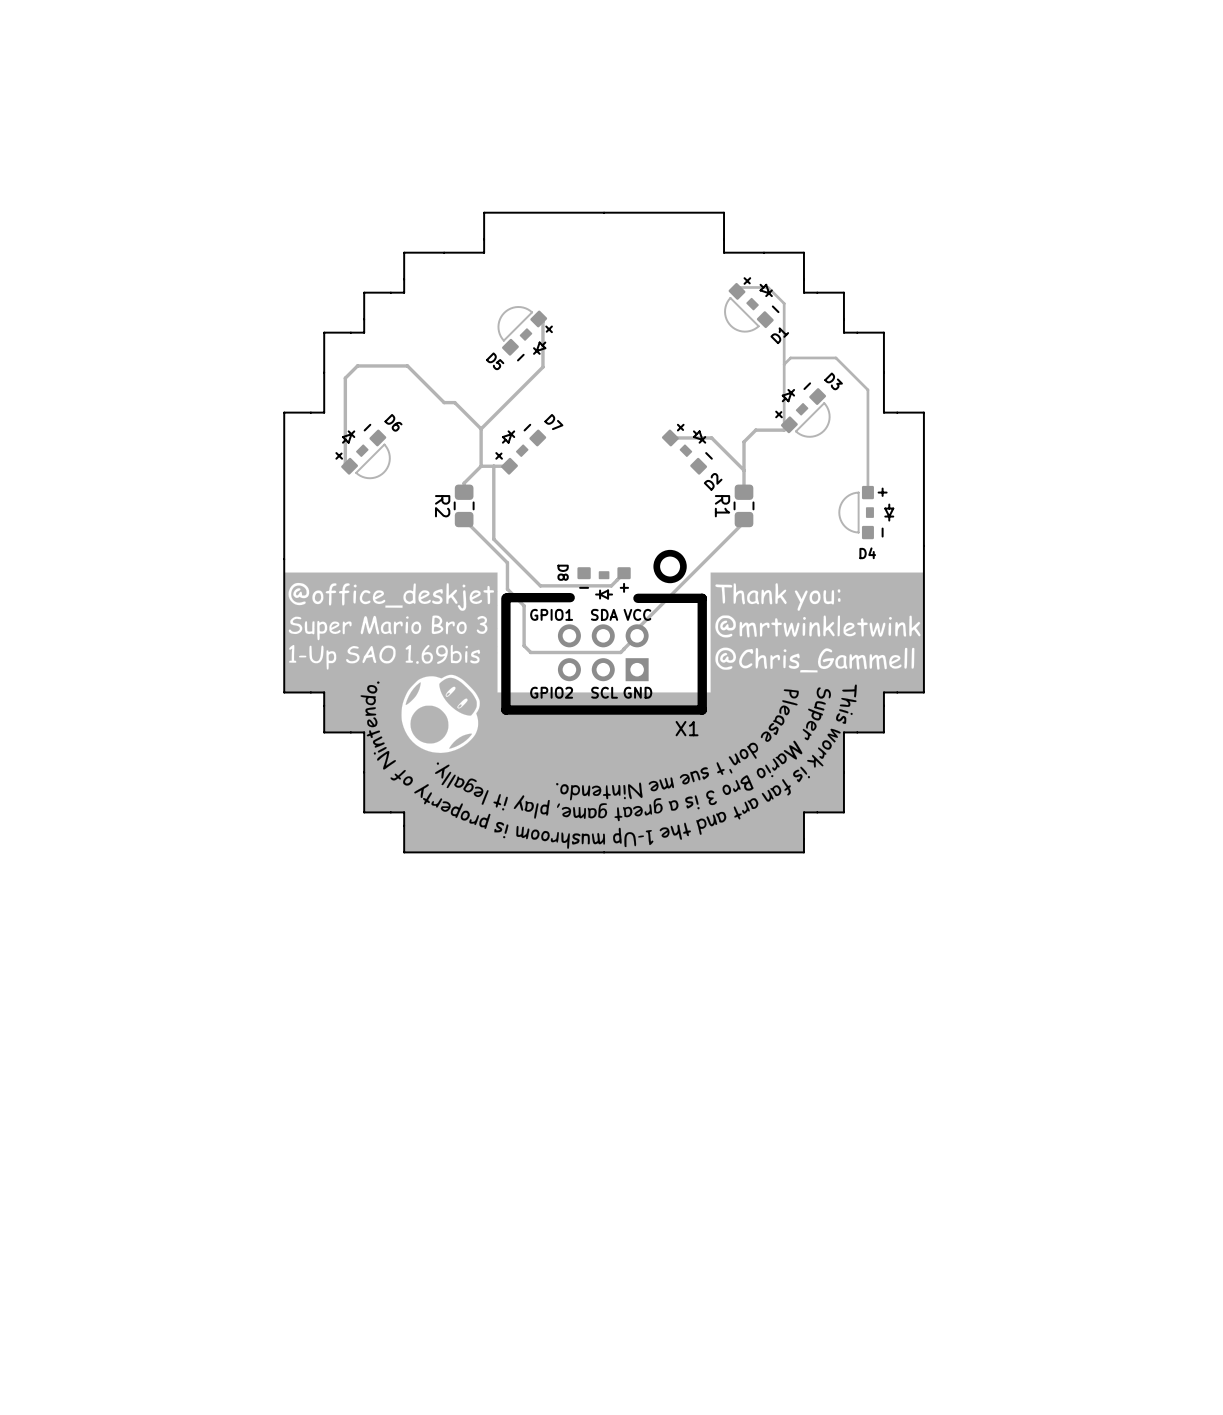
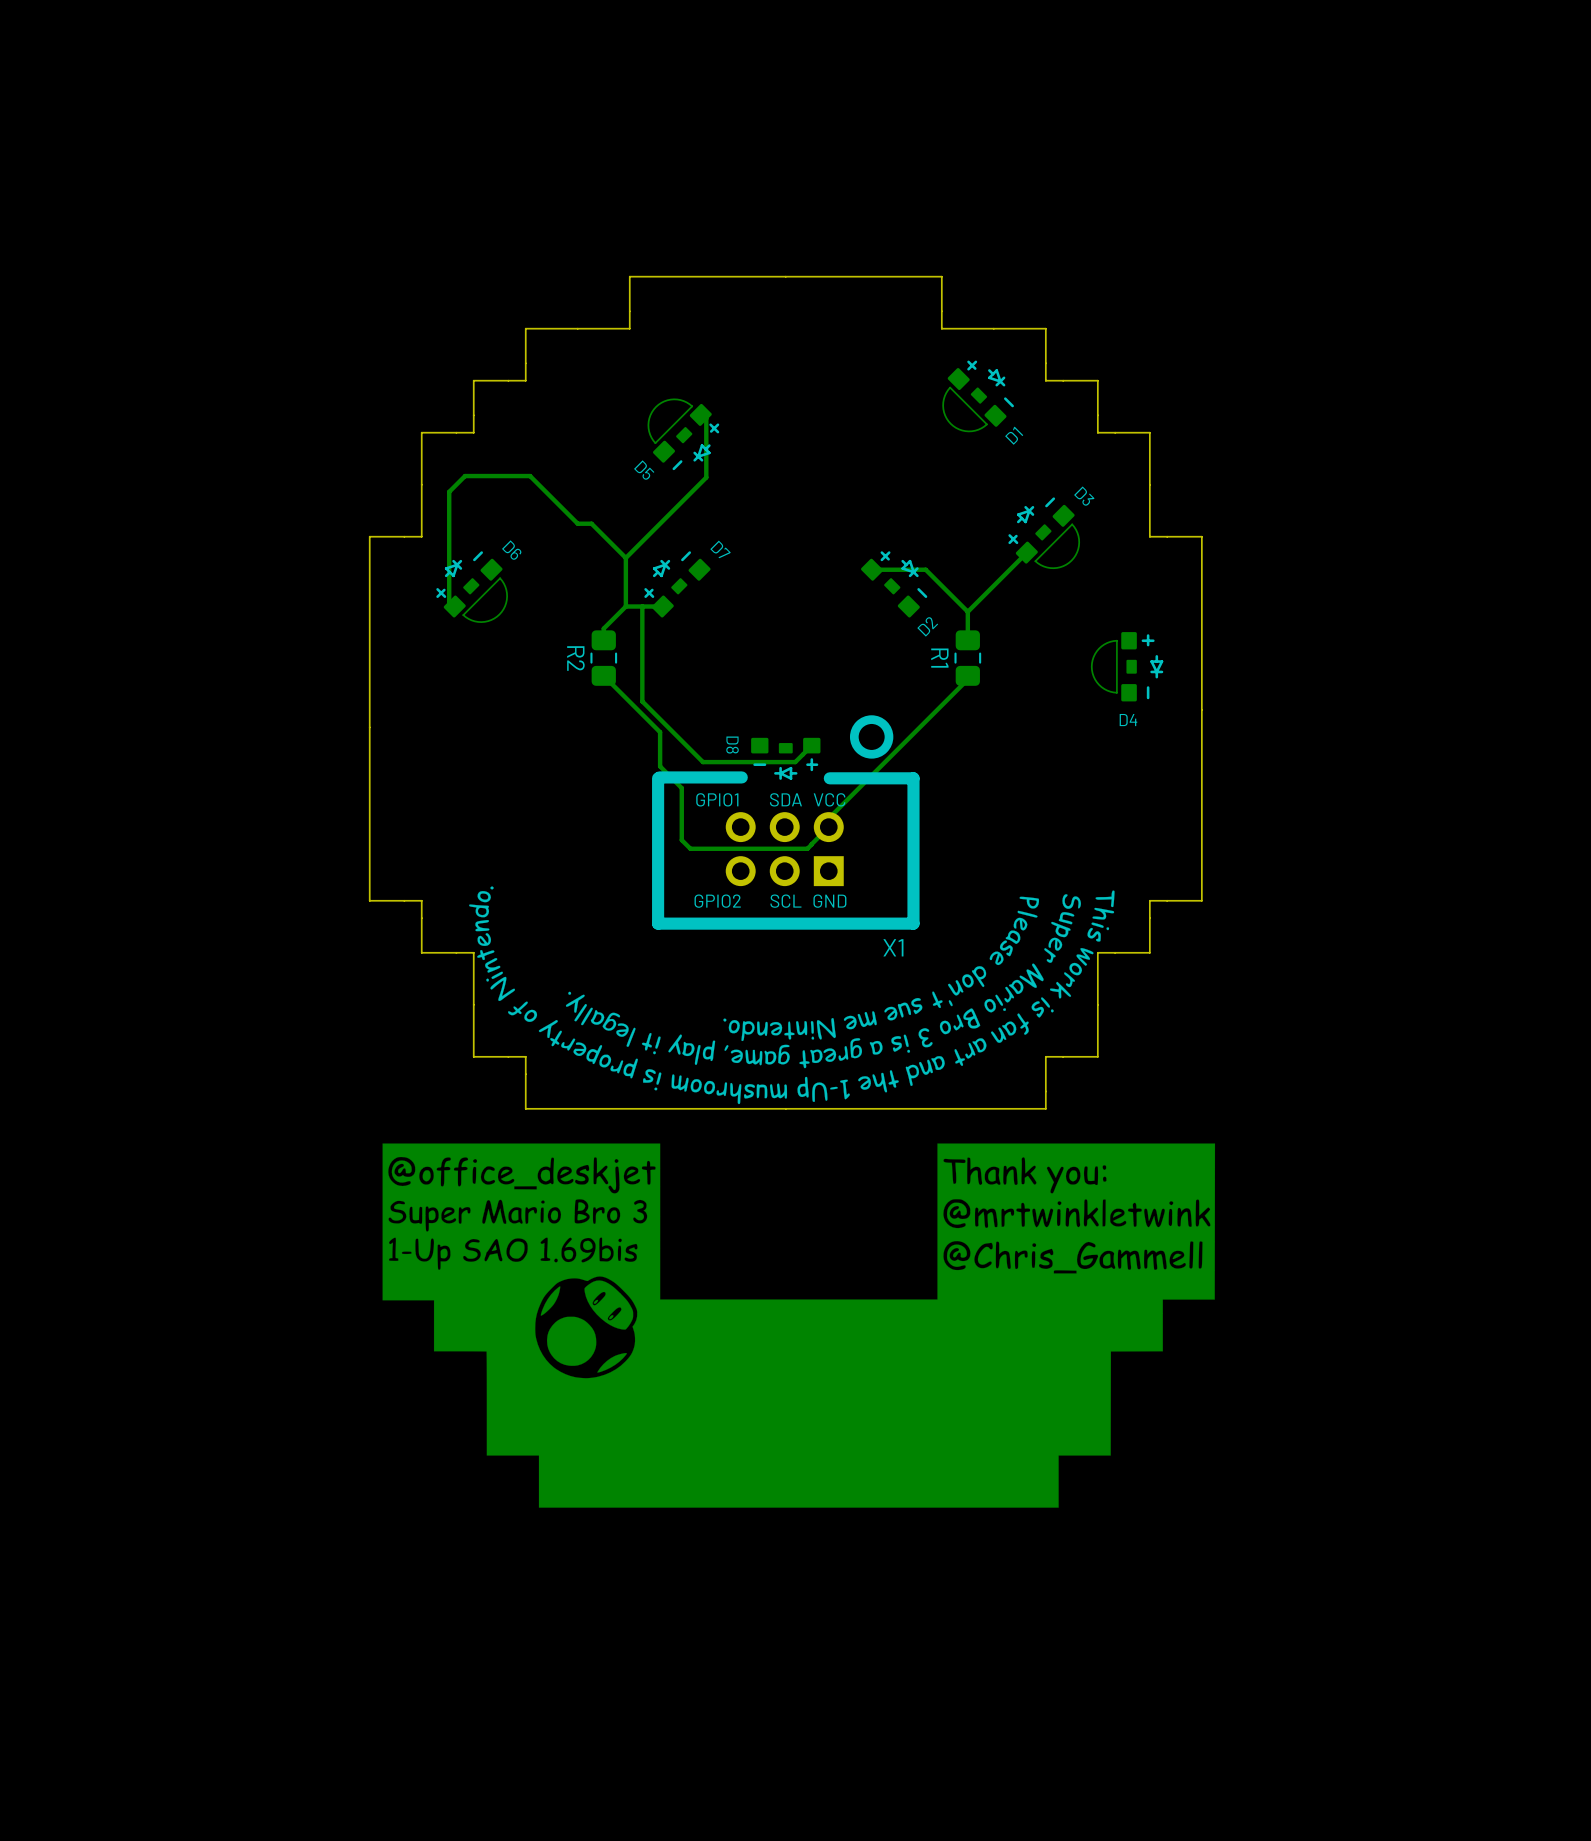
track: (736, 290) (739, 287) (768, 287) (784, 303) (784, 430) (755, 430) (744, 441) (744, 470) -> (1020, 559) (967, 611)
track: (784, 364) (790, 357) (835, 357) (867, 389) (867, 491) -> none
drawing position: (604, 712) -> (798, 1325)

